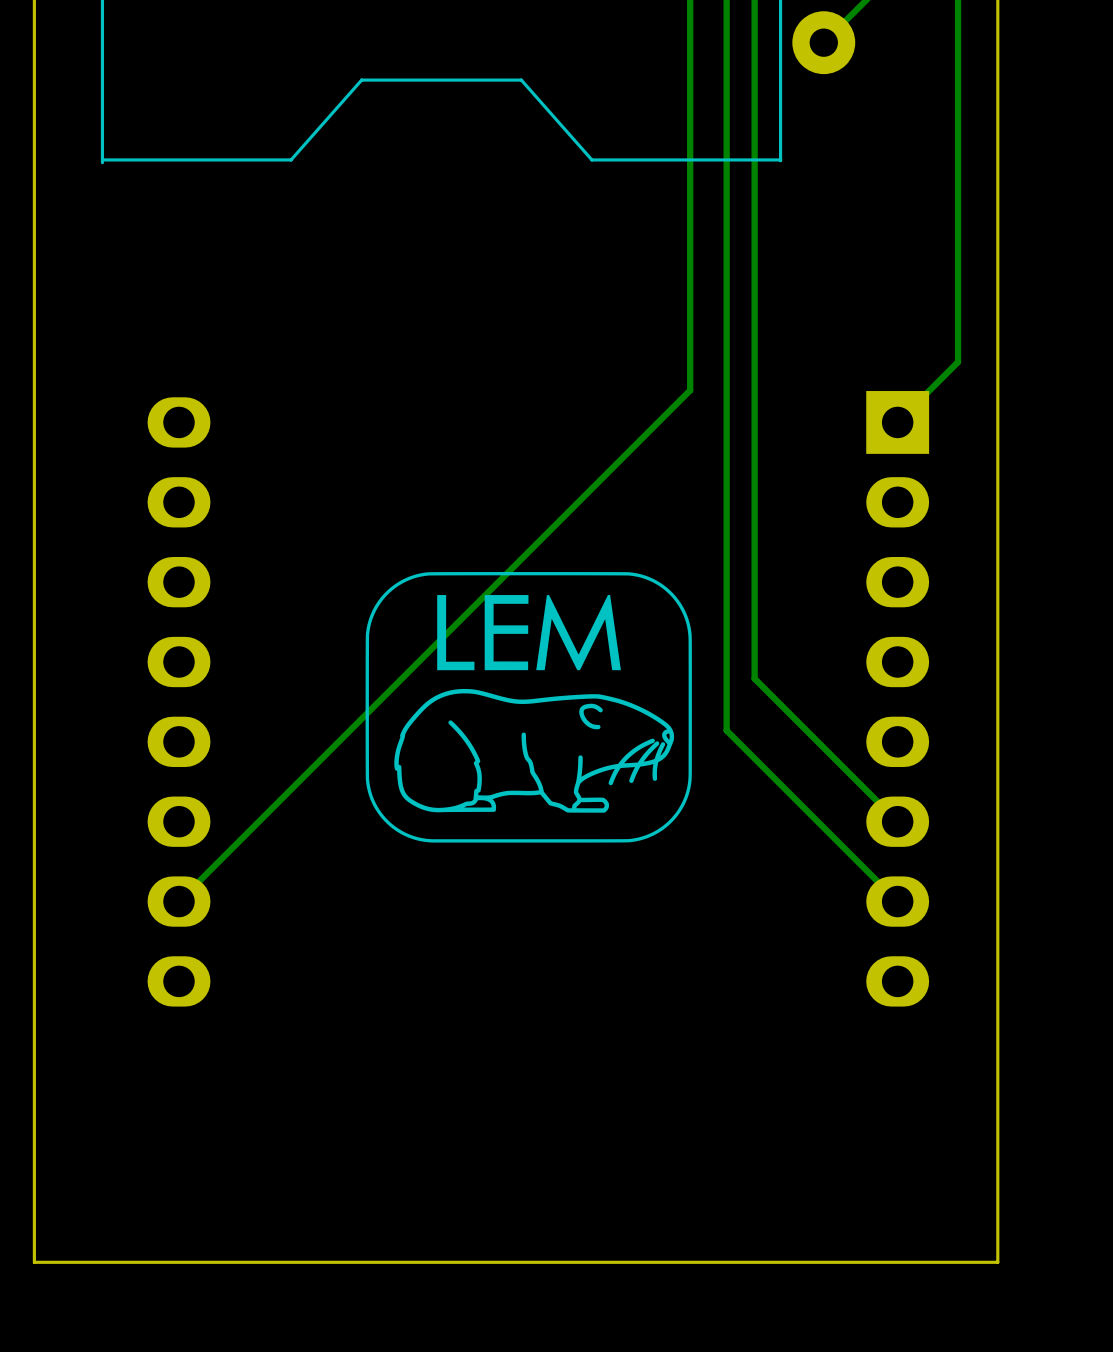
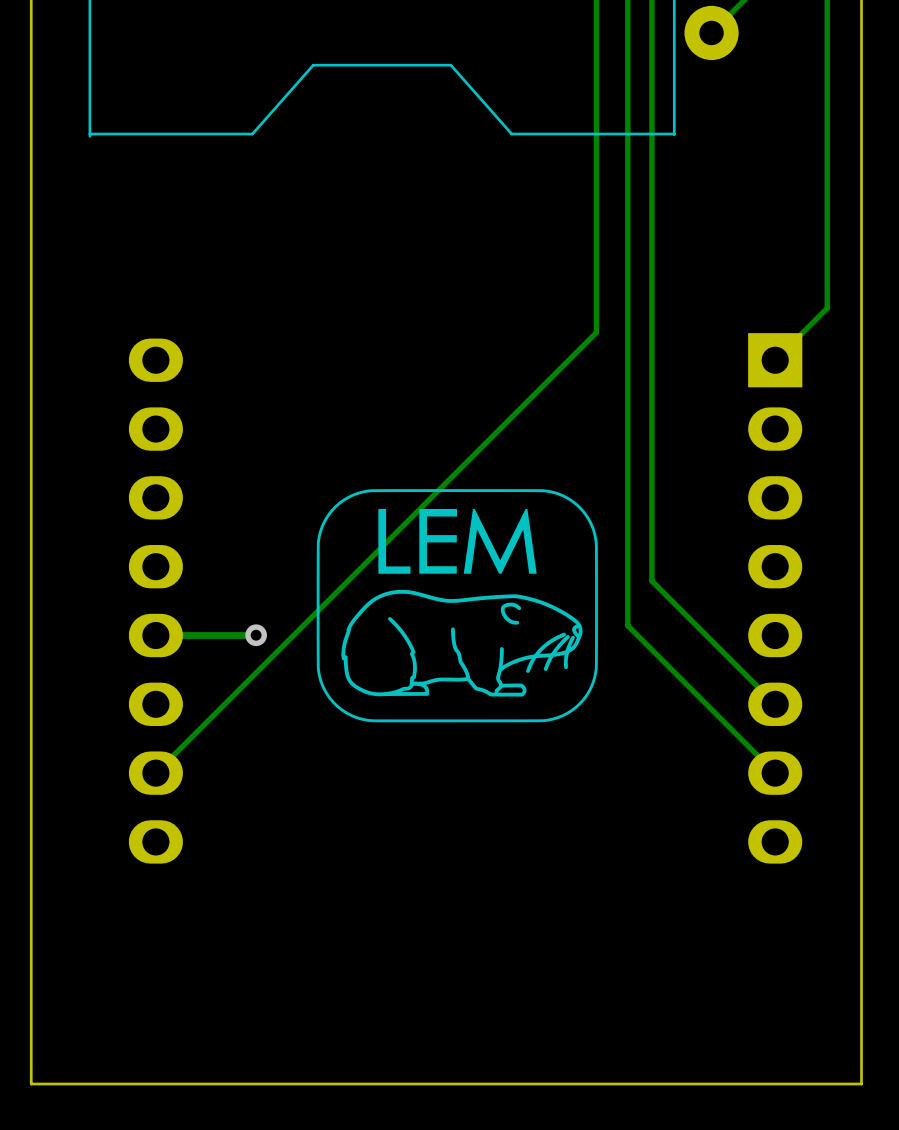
track: none -> (255, 635) (155, 635)
via: none -> (256, 635)

